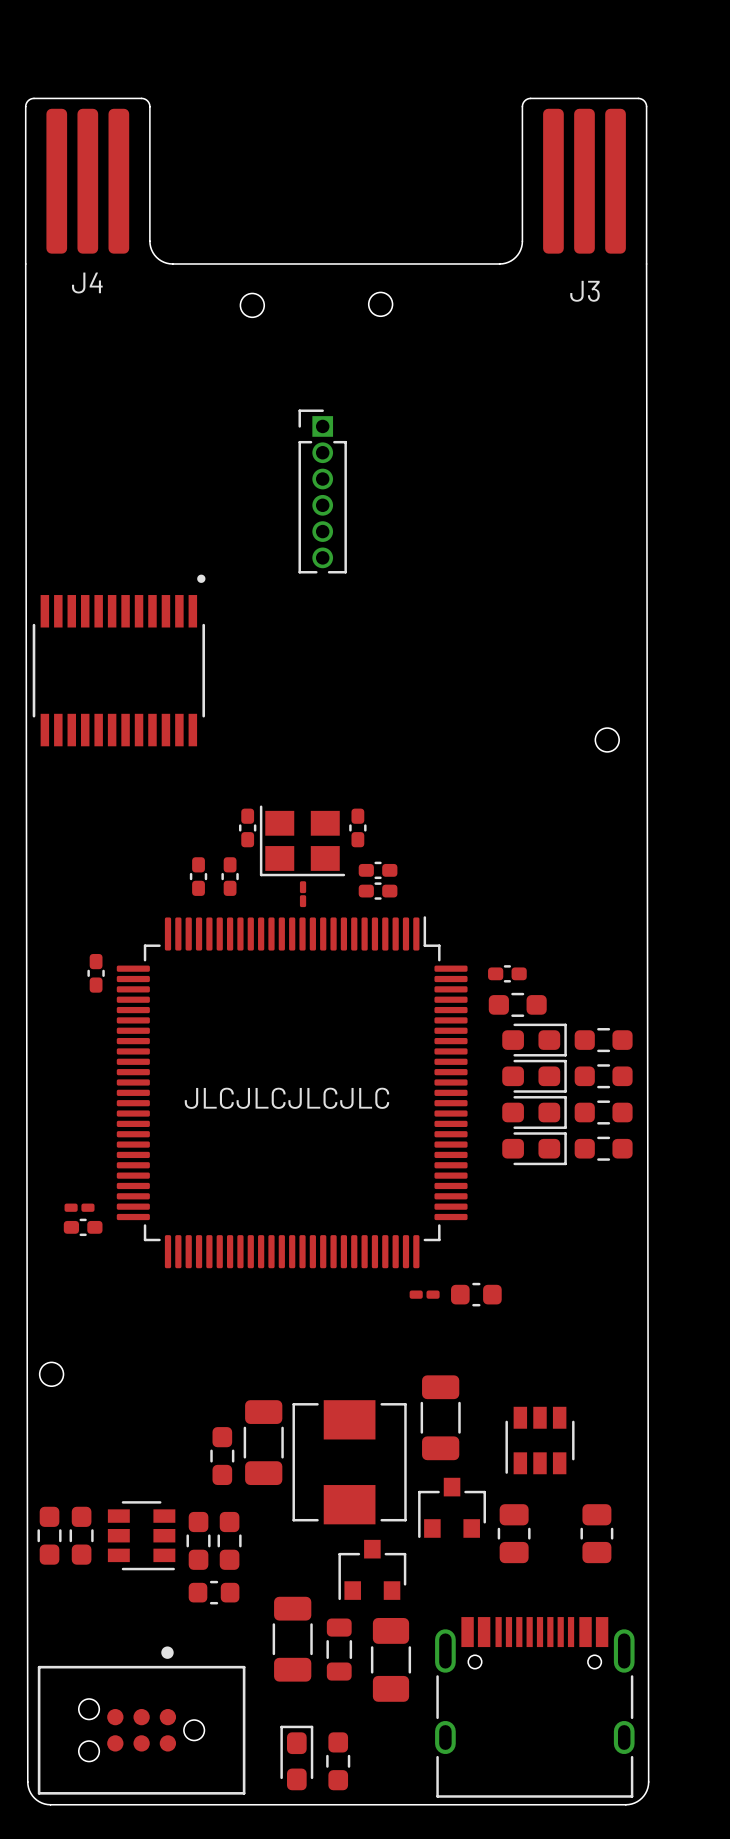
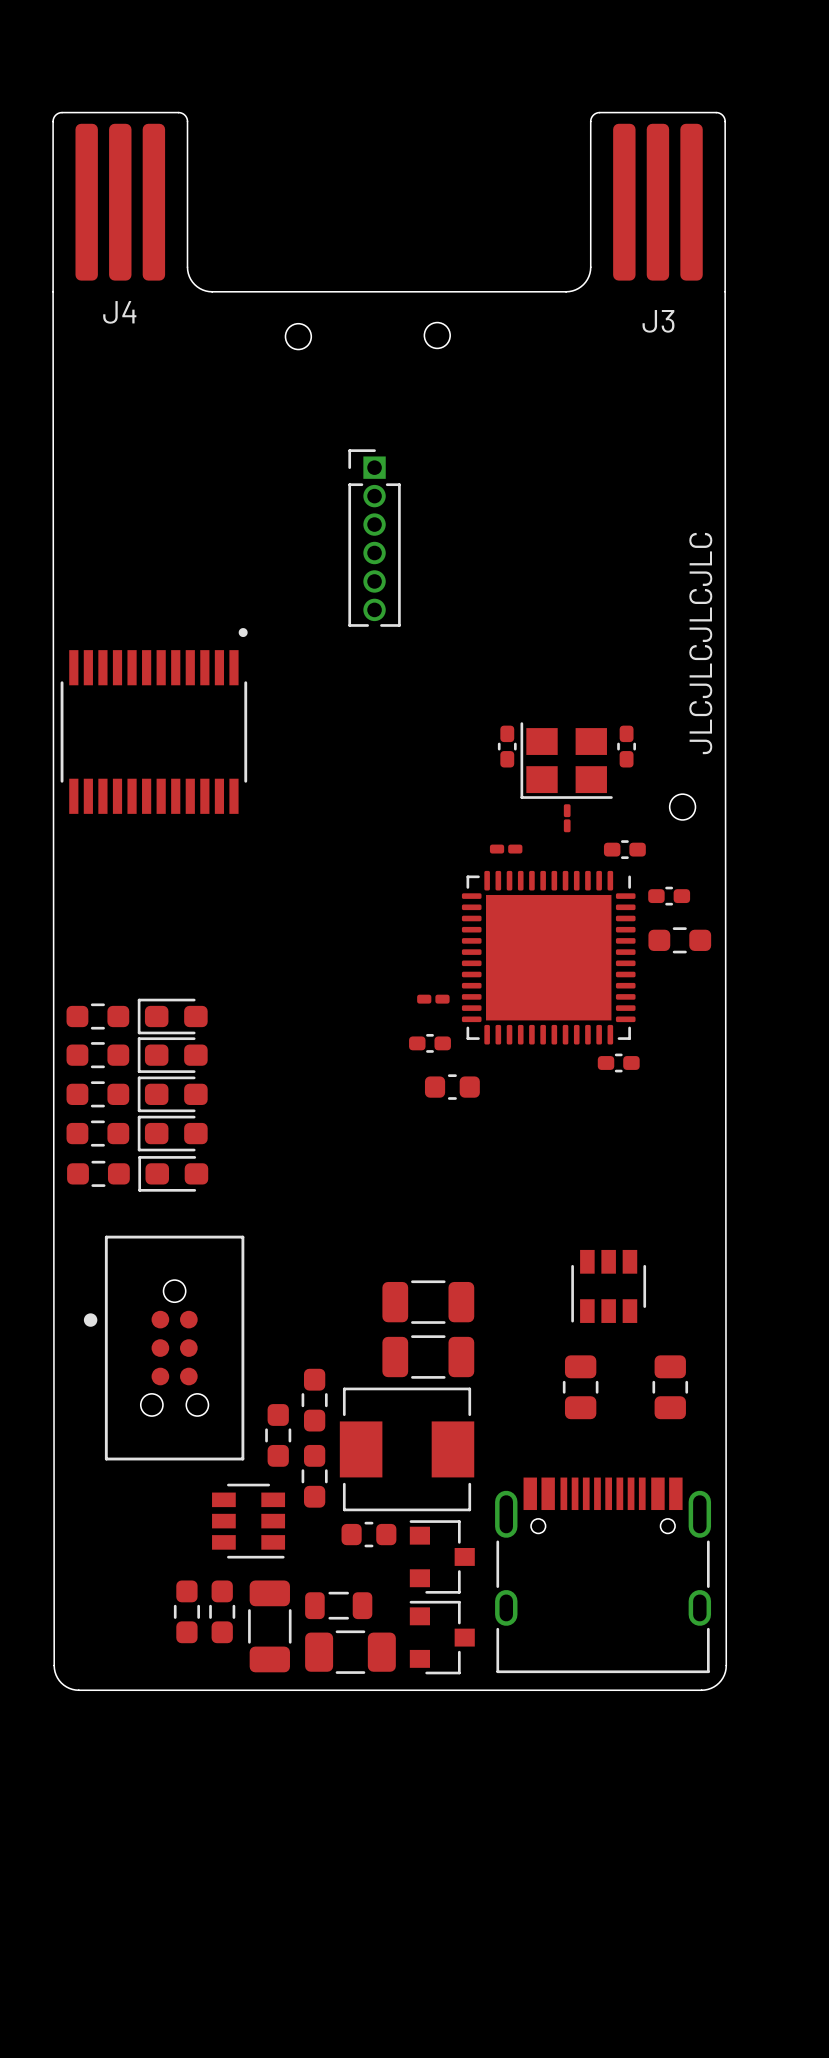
board edge: (25, 263) (27, 1782) (29, 1790) (39, 1801) (50, 1804) (625, 1804) (634, 1803) (641, 1798) (646, 1790) (648, 1782) (646, 263) -> (53, 291) (54, 1665) (56, 1675) (66, 1686) (78, 1690) (701, 1690) (711, 1688) (719, 1683) (724, 1675) (726, 1665) (725, 291)
text: none -> JLCJLCJLCJLC (700, 643)
part: none -> (507, 746)
part: none -> (626, 746)
part: none -> (506, 849)
part: none -> (624, 849)
part: none -> (669, 896)
part: (247, 827) -> none
part: (357, 827) -> none
part position: (302, 840) -> (566, 760)
part: none -> (679, 940)
part: (378, 870) -> none
part: (198, 876) -> none
part: (230, 876) -> none
part: none -> (548, 957)
part: (378, 891) -> none
part position: (303, 894) -> (567, 818)
part: none -> (433, 999)
part: none -> (97, 1016)
part: none -> (172, 1016)
part: none -> (430, 1043)
part: none -> (97, 1055)
part: none -> (172, 1055)
part: (96, 973) -> none
part position: (507, 973) -> (618, 1062)
part: none -> (452, 1087)
part: (517, 1004) -> none
part: none -> (97, 1094)
part: none -> (172, 1094)
part: (534, 1040) -> none
part: (603, 1040) -> none
part: none -> (97, 1133)
part: none -> (172, 1133)
part: (534, 1076) -> none
part: (603, 1076) -> none
part: none -> (98, 1173)
part: none -> (173, 1173)
part: (292, 1092) -> none
text: JLCJLCJLCJLC (286, 1098) -> none
part: (534, 1112) -> none
part: (603, 1112) -> none
part: (534, 1148) -> none
part: (603, 1148) -> none
part: none -> (608, 1286)
part: none -> (428, 1302)
part: (79, 1207) -> none
part: (83, 1227) -> none
part: none -> (428, 1357)
part: none -> (580, 1387)
part: none -> (670, 1387)
part: none -> (314, 1400)
part: (424, 1294) -> none
part: (476, 1294) -> none
part: none -> (278, 1435)
part: none -> (314, 1476)
round board edge: [39, 1361, 65, 1387] -> none
part footprint: [505, 1406, 575, 1475] -> [495, 1477, 712, 1674]
part: none -> (368, 1534)
part: (440, 1417) -> none
part: none -> (442, 1556)
part position: (263, 1442) -> (269, 1626)
part: (222, 1456) -> none
part rotation: 0° (349, 1462) -> 90° clockwise (407, 1449)
part position: (349, 1462) -> (407, 1449)
part: none -> (186, 1611)
part: none -> (222, 1611)
part: none -> (442, 1637)
part: (452, 1507) -> none
part: (514, 1533) -> none
part: (596, 1533) -> none
part: (49, 1535) -> none
part: (81, 1535) -> none
part position: (141, 1535) -> (248, 1521)
part: (198, 1540) -> none
part: (229, 1540) -> none
part: (372, 1569) -> none
part: (214, 1592) -> none
part: (292, 1639) -> none
part rotation: 0° (339, 1649) -> 90° clockwise (338, 1605)
part position: (339, 1649) -> (338, 1605)
part rotation: 0° (390, 1659) -> 90° clockwise (350, 1652)
part position: (390, 1659) -> (350, 1652)
part: (534, 1707) -> none
part rotation: 0° (141, 1720) -> 90° counterclockwise (164, 1348)
part position: (141, 1720) -> (164, 1348)
part: (296, 1757) -> none
part: (338, 1761) -> none

